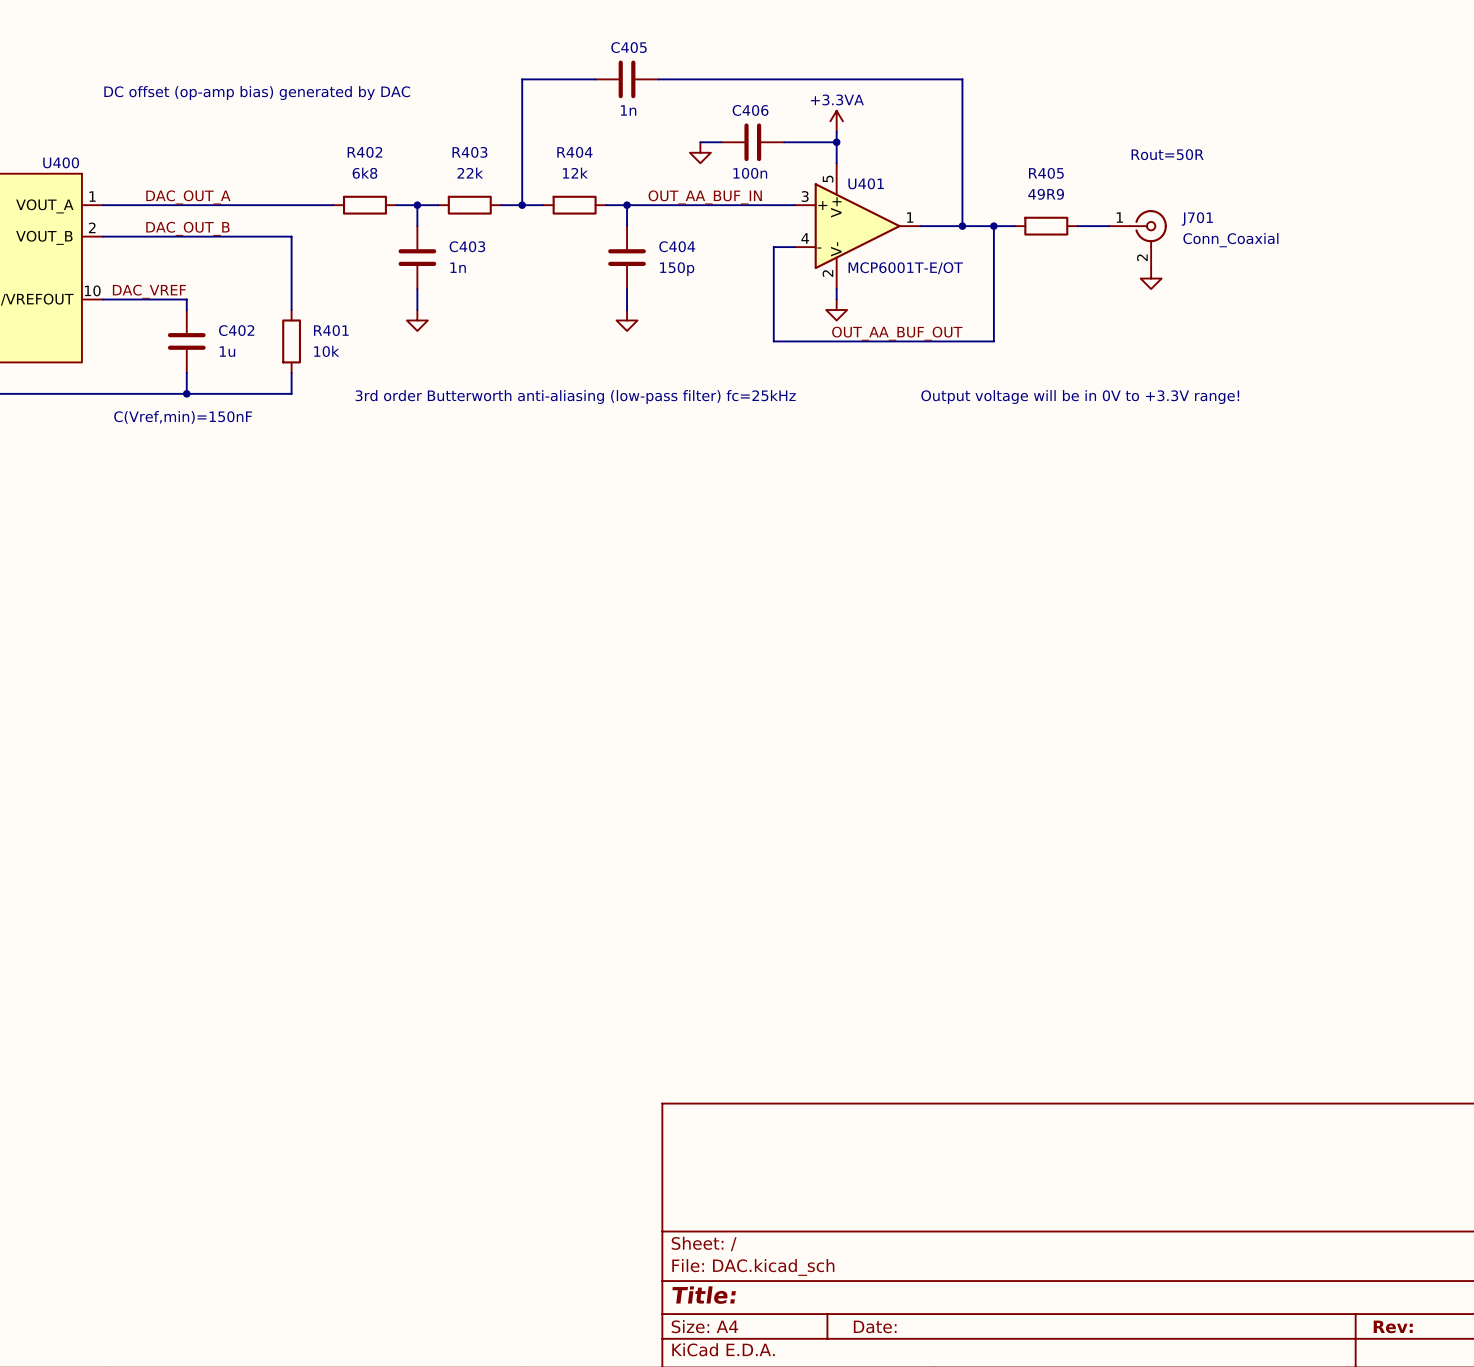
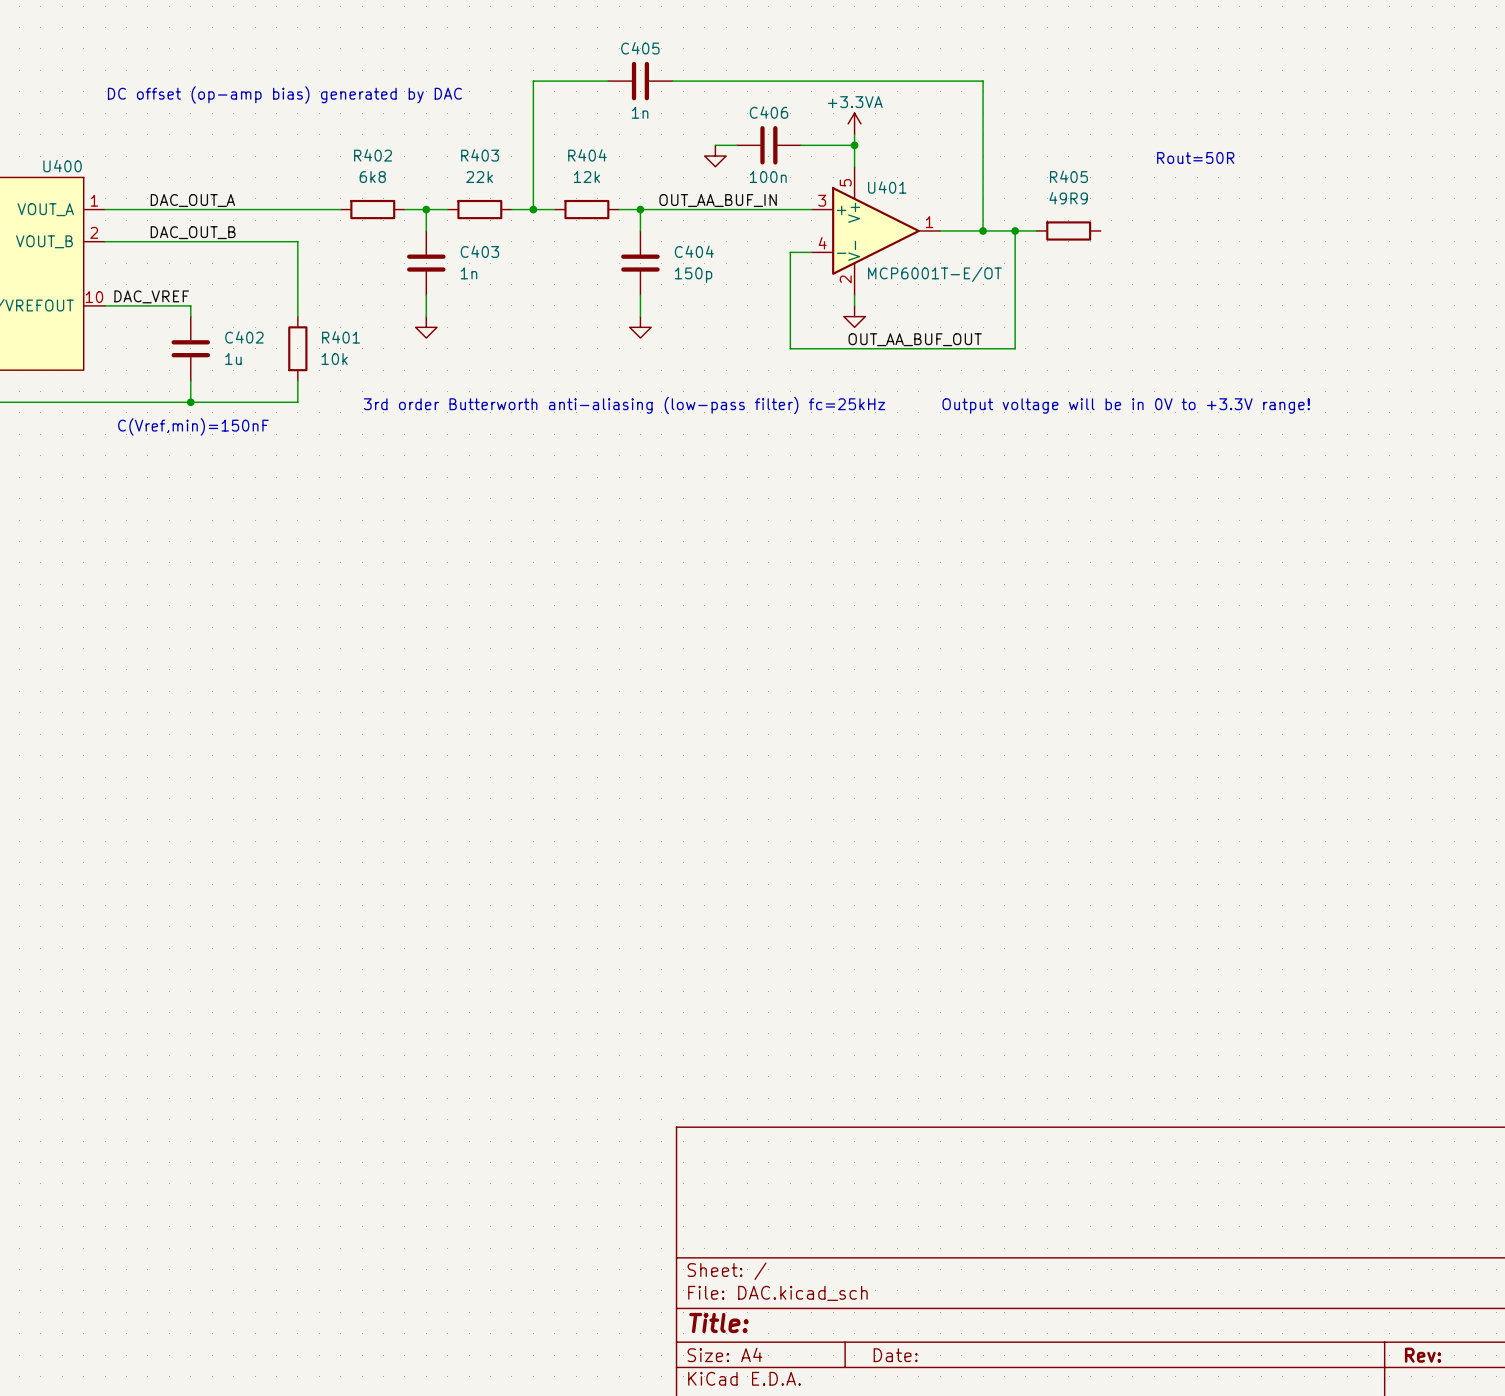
wire: (1077, 226) (1109, 226) -> none
J701: Conn_Coaxial (1138, 239) -> none
power symbol: (1151, 278) -> none

